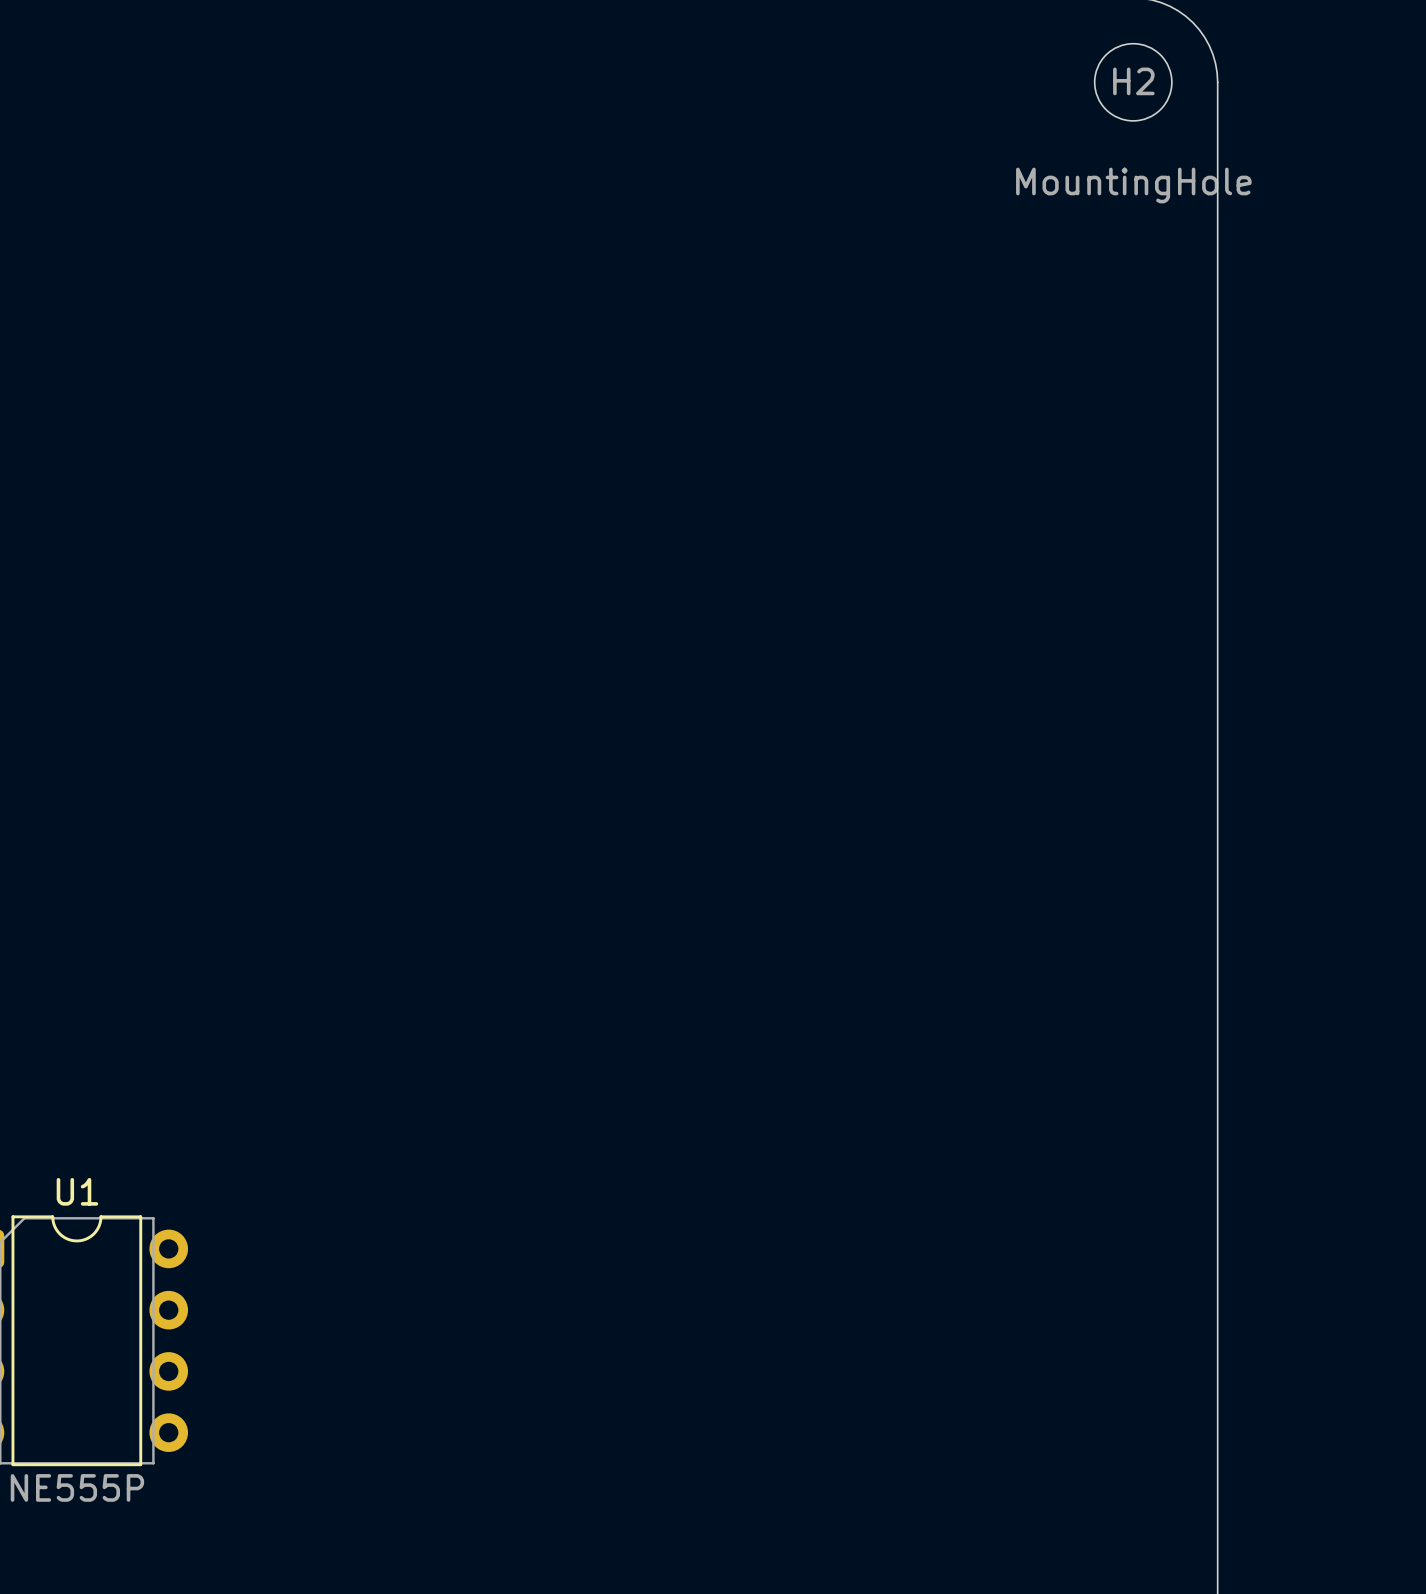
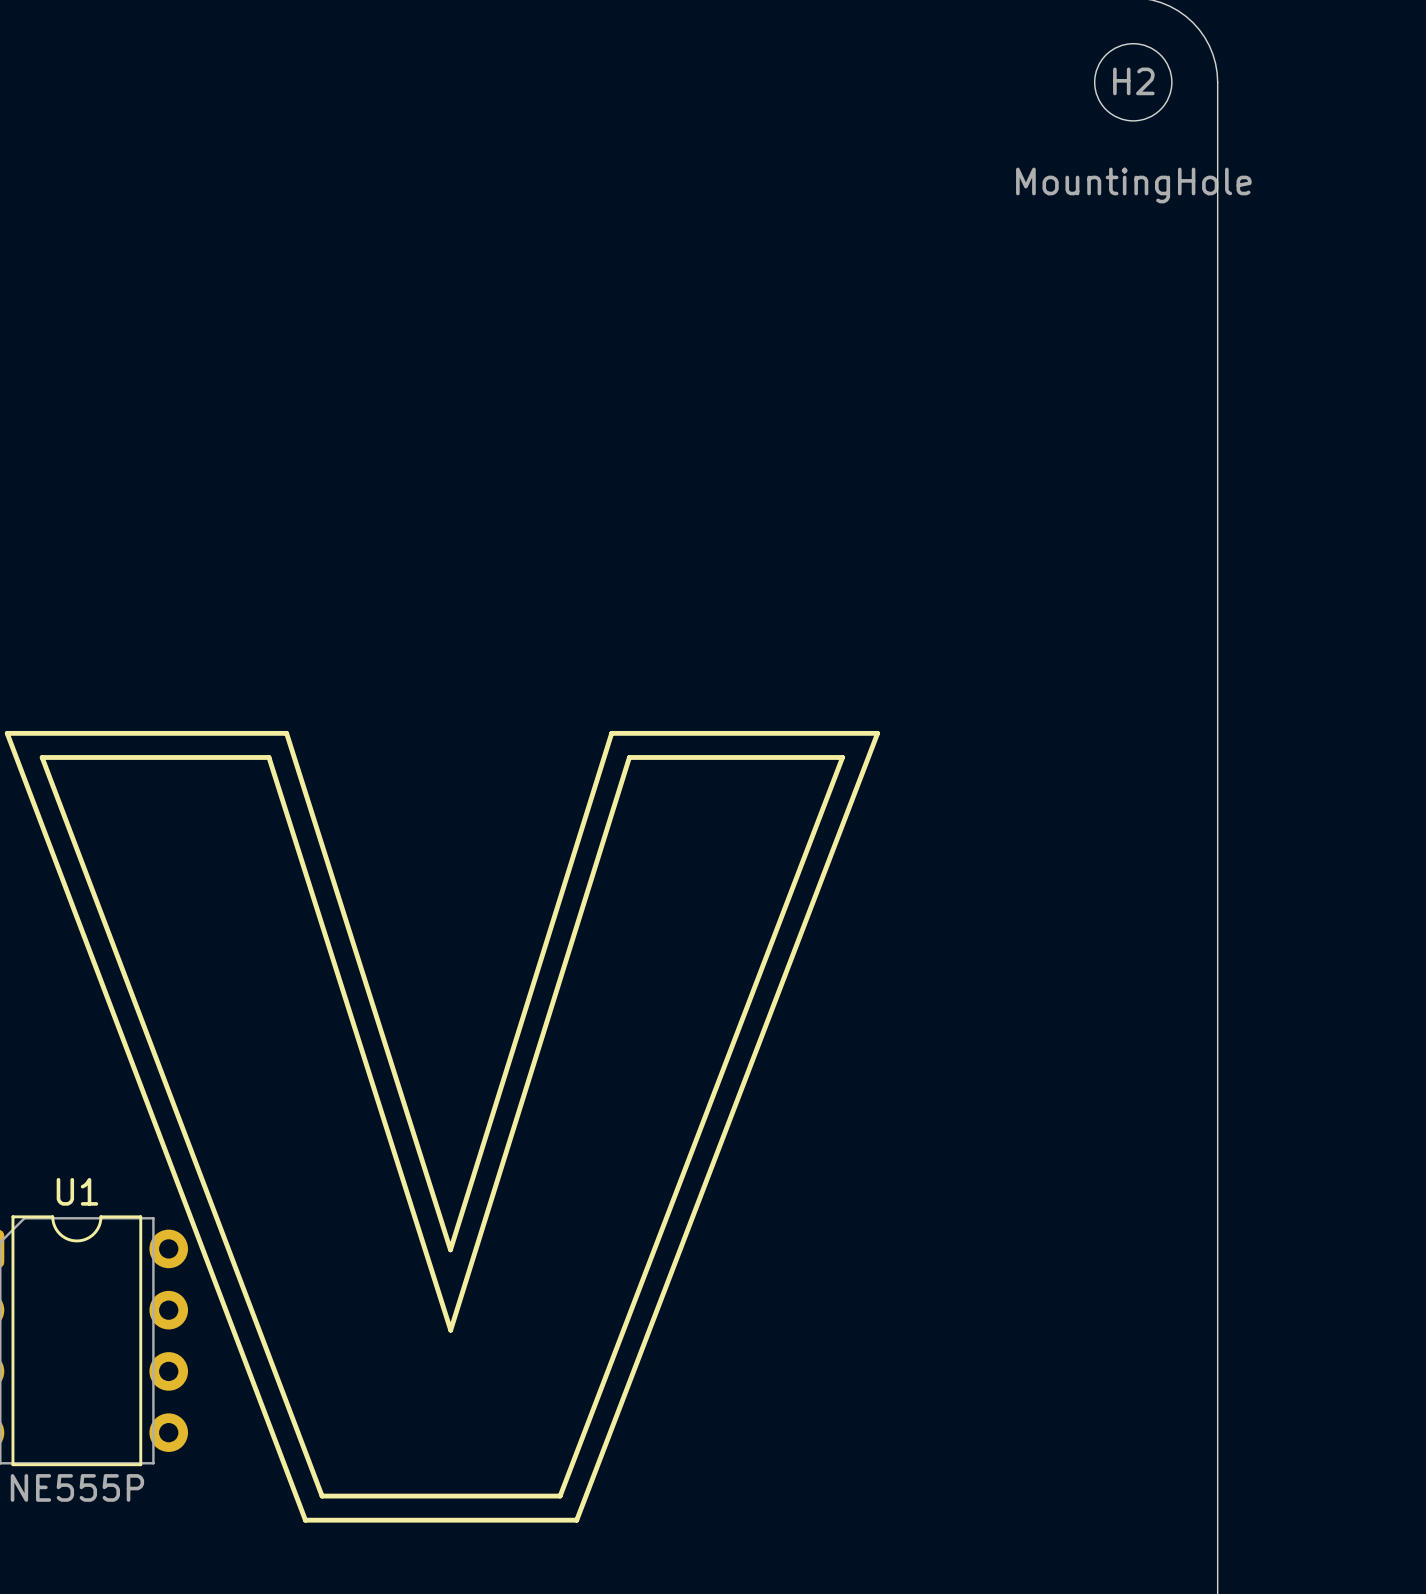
line: none -> (7, 733) (286, 733) (450, 1249) (611, 733) (877, 733) (576, 1520) (305, 1520) (7, 733)
line: none -> (42, 757) (268, 757) (450, 1330) (629, 757) (842, 757) (560, 1496) (322, 1496) (42, 757)

